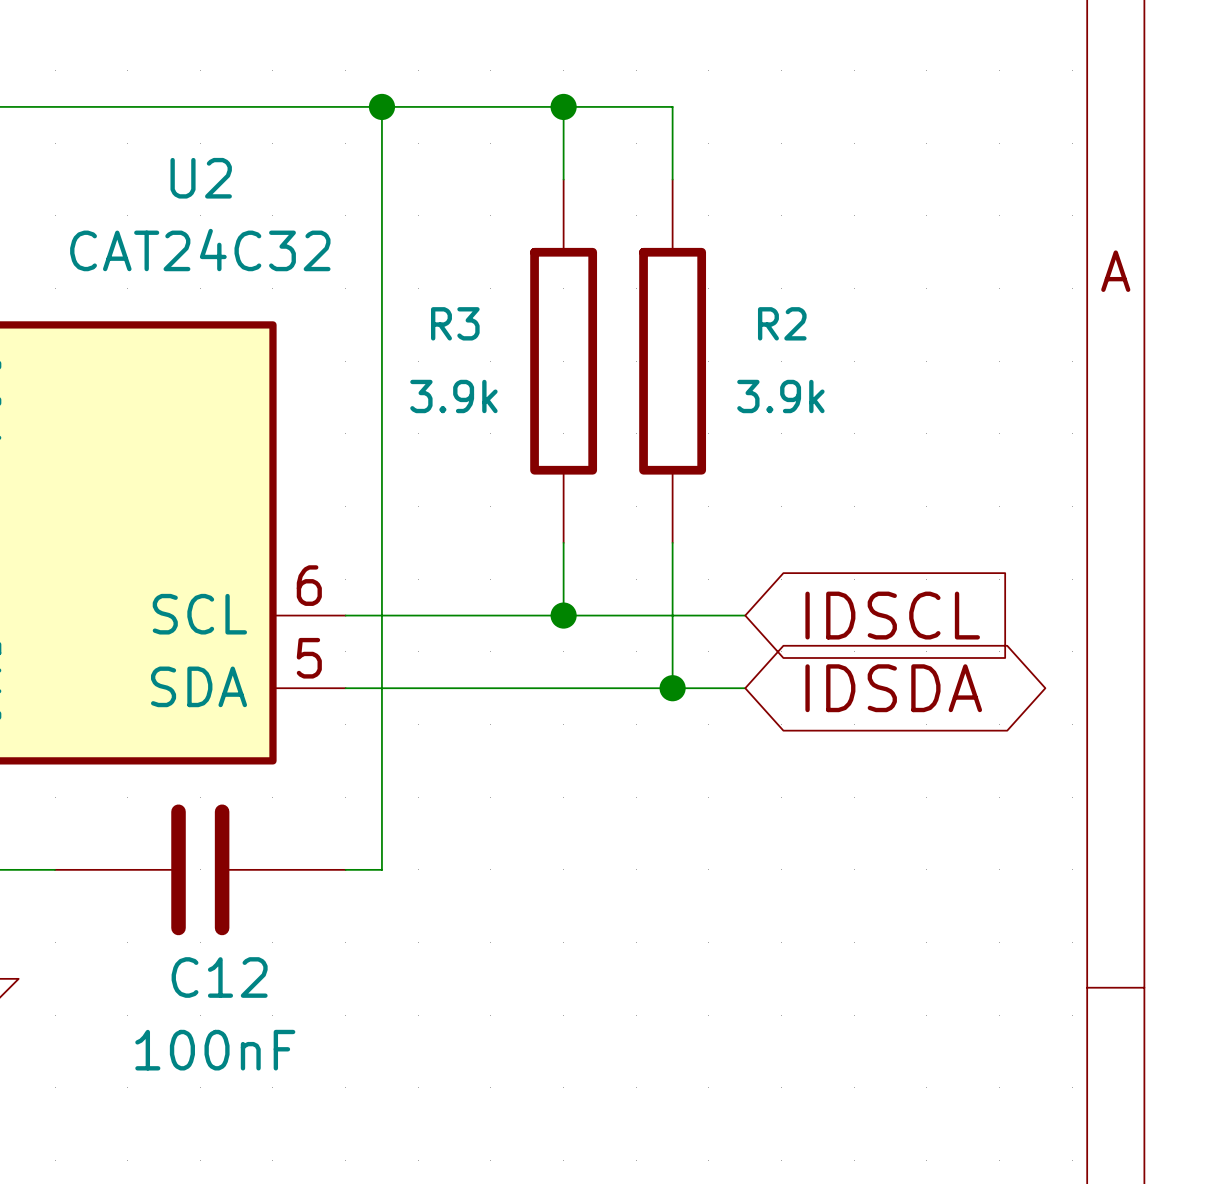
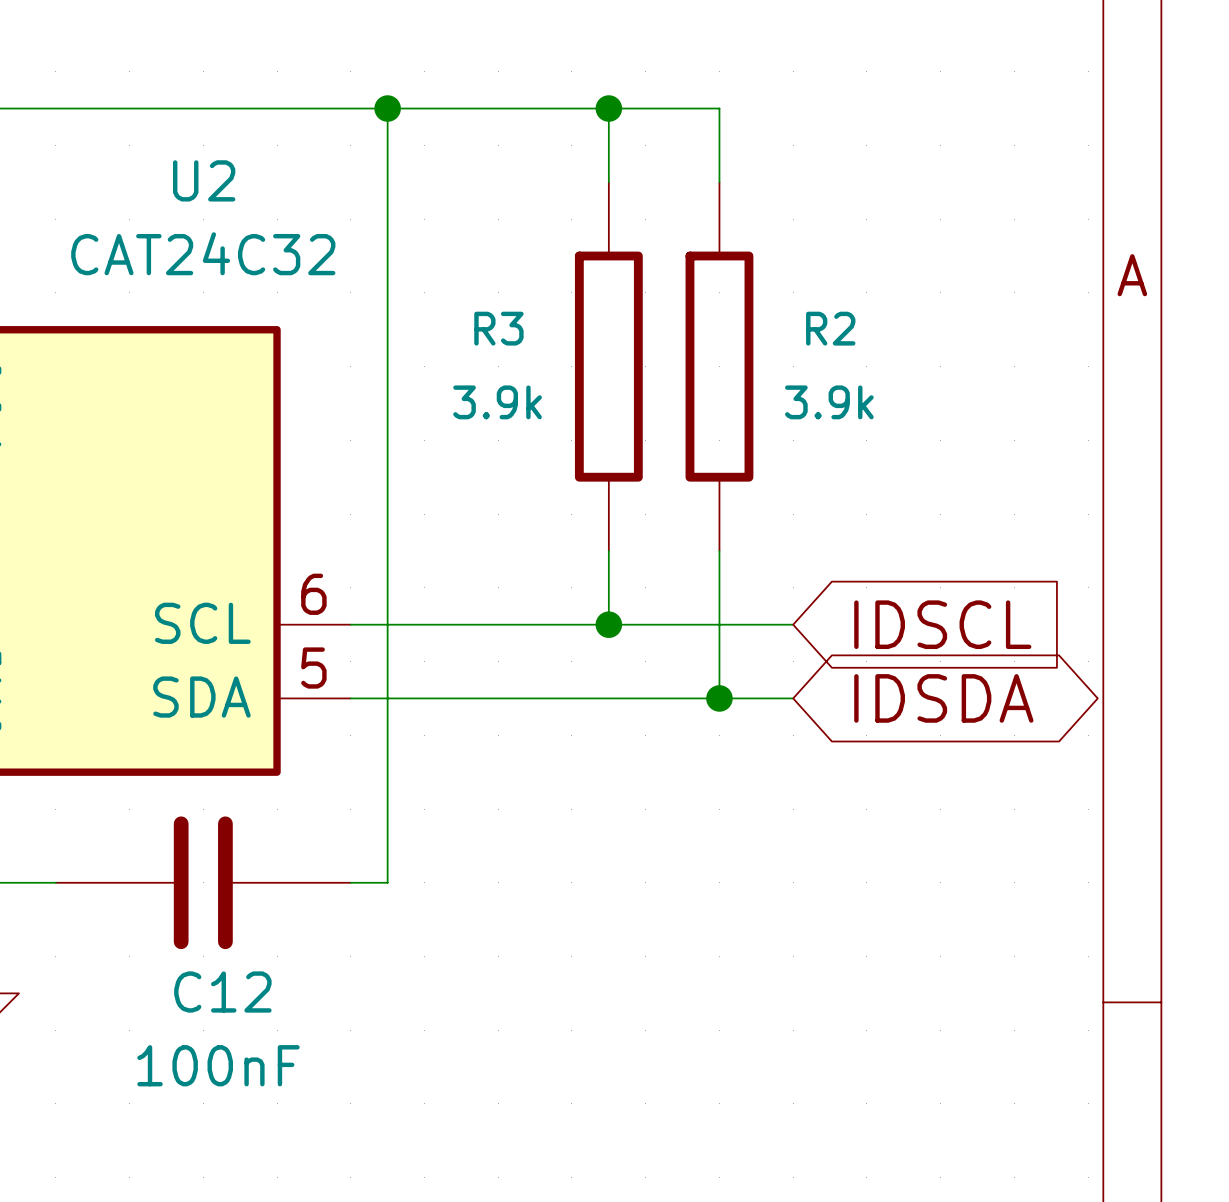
wire: (563, 106) (563, 179) -> (608, 108) (608, 182)
junction position: (563, 106) -> (608, 108)
wire: (672, 106) (672, 179) -> (682, 108) (719, 108) (719, 182)
R3 position: (563, 361) -> (608, 366)
R2 position: (672, 361) -> (719, 366)
wire: (563, 542) (563, 615) -> (608, 550) (608, 624)
wire: (672, 542) (672, 688) -> (719, 550) (719, 698)
junction position: (563, 615) -> (608, 624)
wire: none -> (756, 624) (793, 624)
global label position: IDSCL (892, 615) -> IDSCL (942, 624)
junction position: (672, 688) -> (719, 698)
wire: none -> (756, 698) (793, 698)
global label position: IDSDA (893, 688) -> IDSDA (943, 698)

